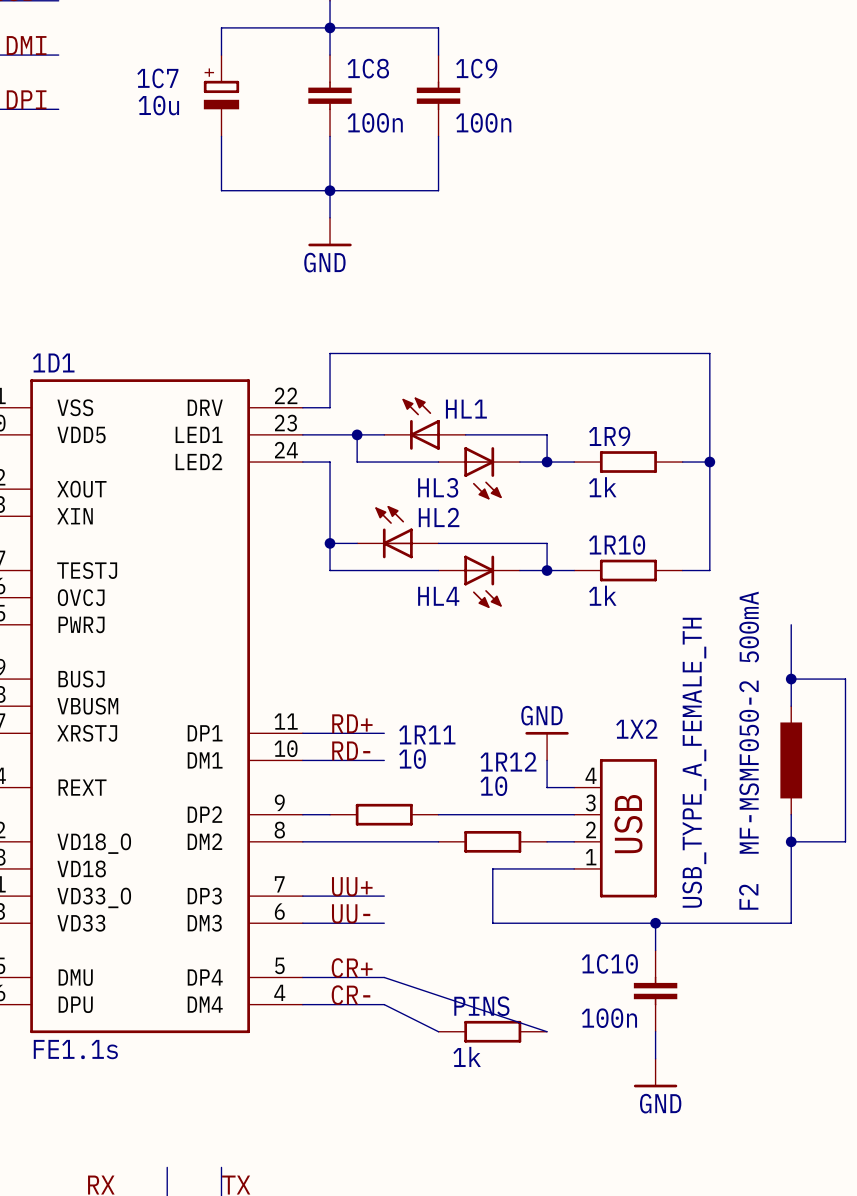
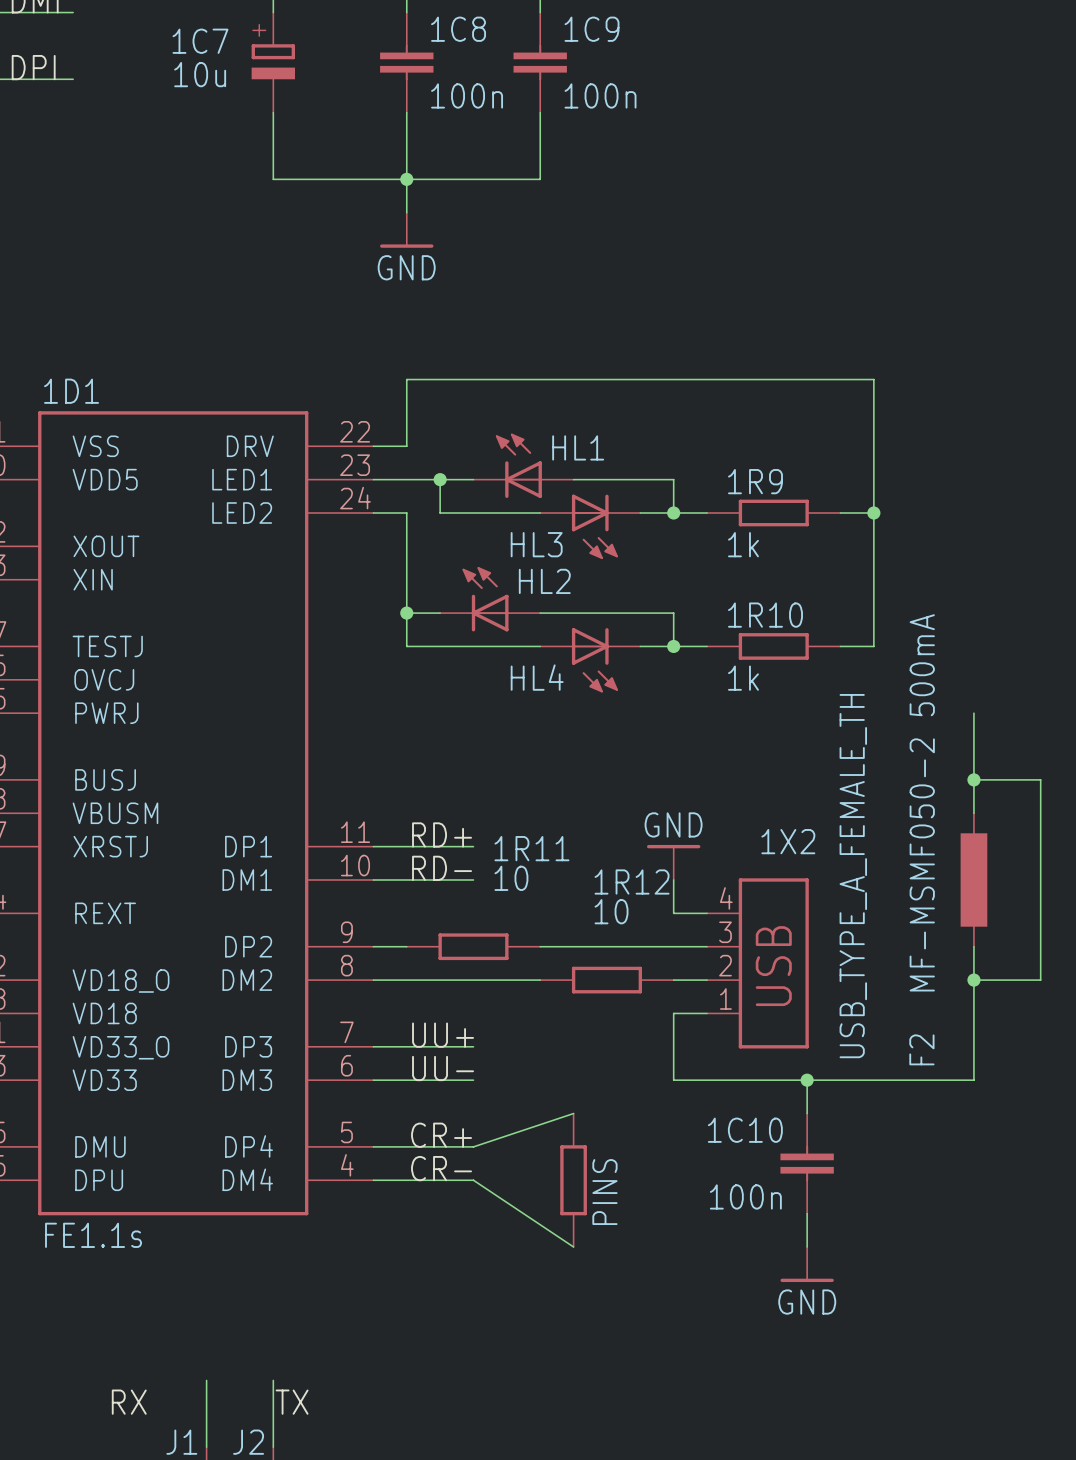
wire: (547, 868) (492, 868) (492, 923) (547, 923) -> (673, 1013) (673, 1080)
wire: (384, 977) (547, 1031) -> (473, 1146) (573, 1113)
wire: (384, 1004) (438, 1031) -> (473, 1180) (573, 1246)
PINS: none -> (573, 1180)
PINS: 1k (492, 1031) -> none

